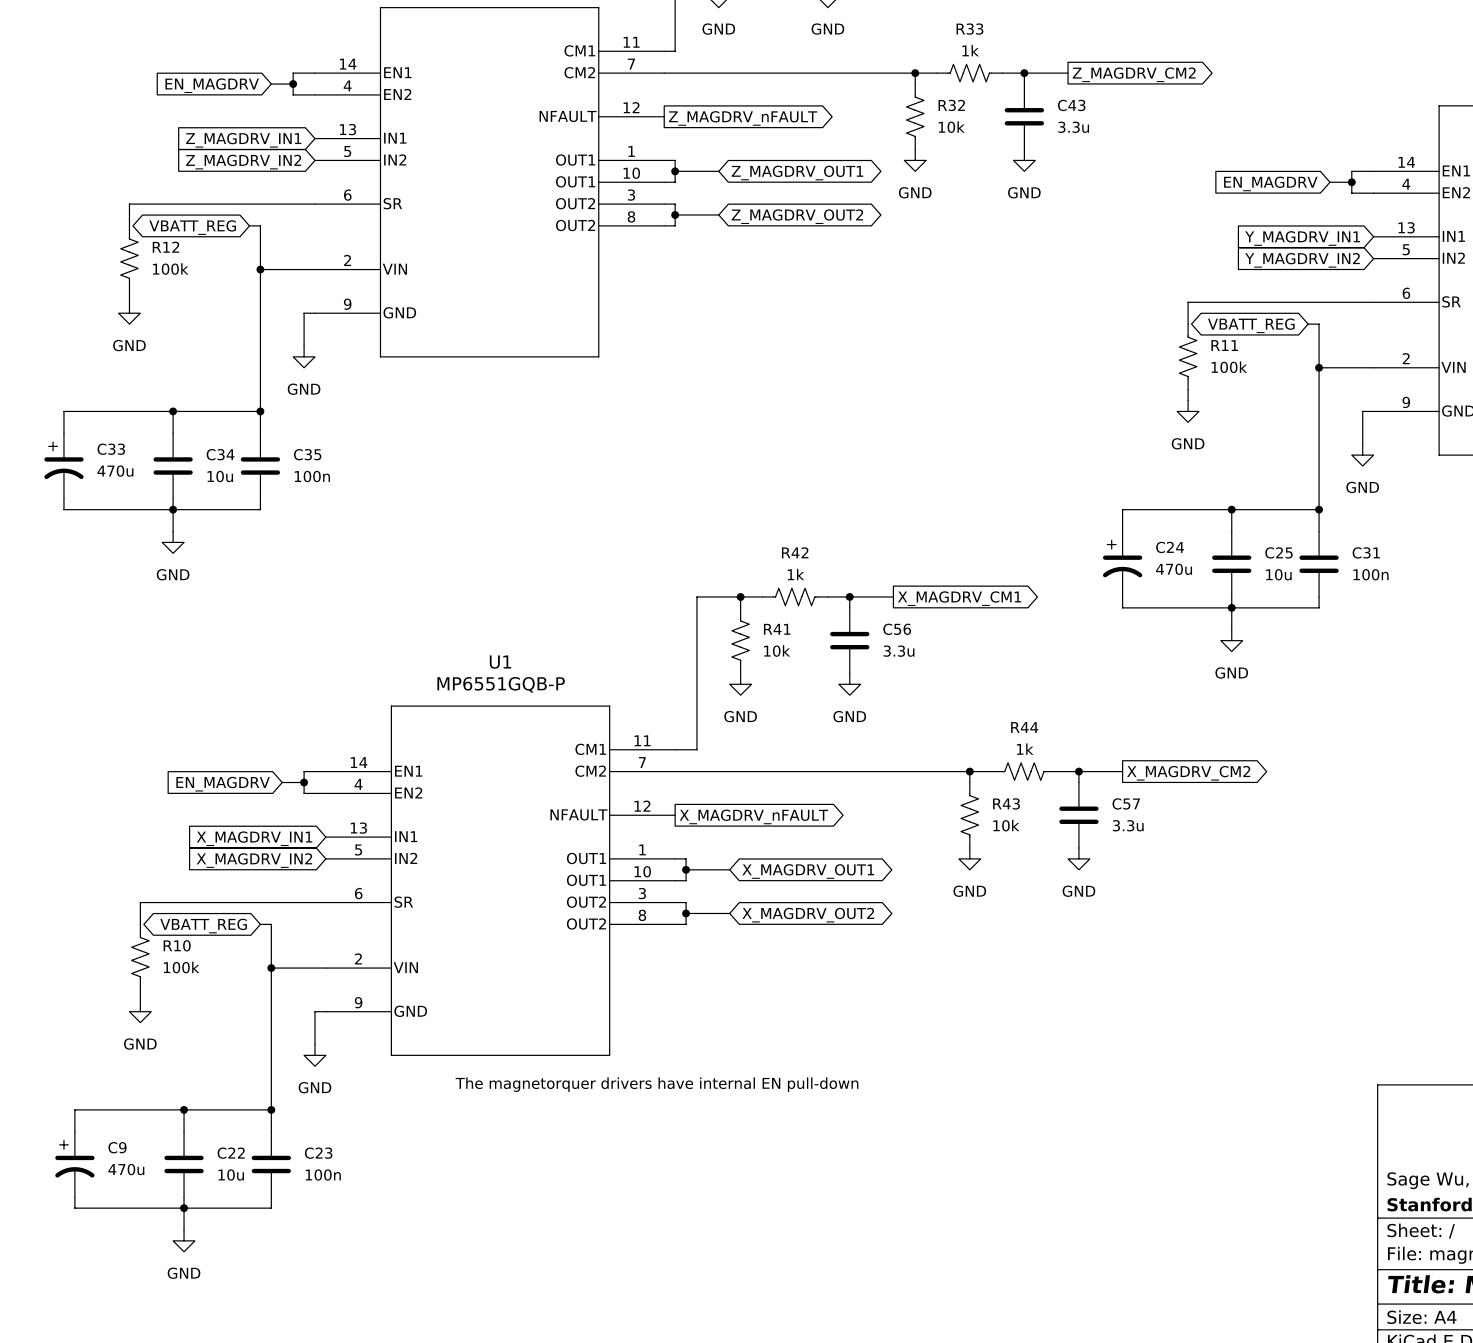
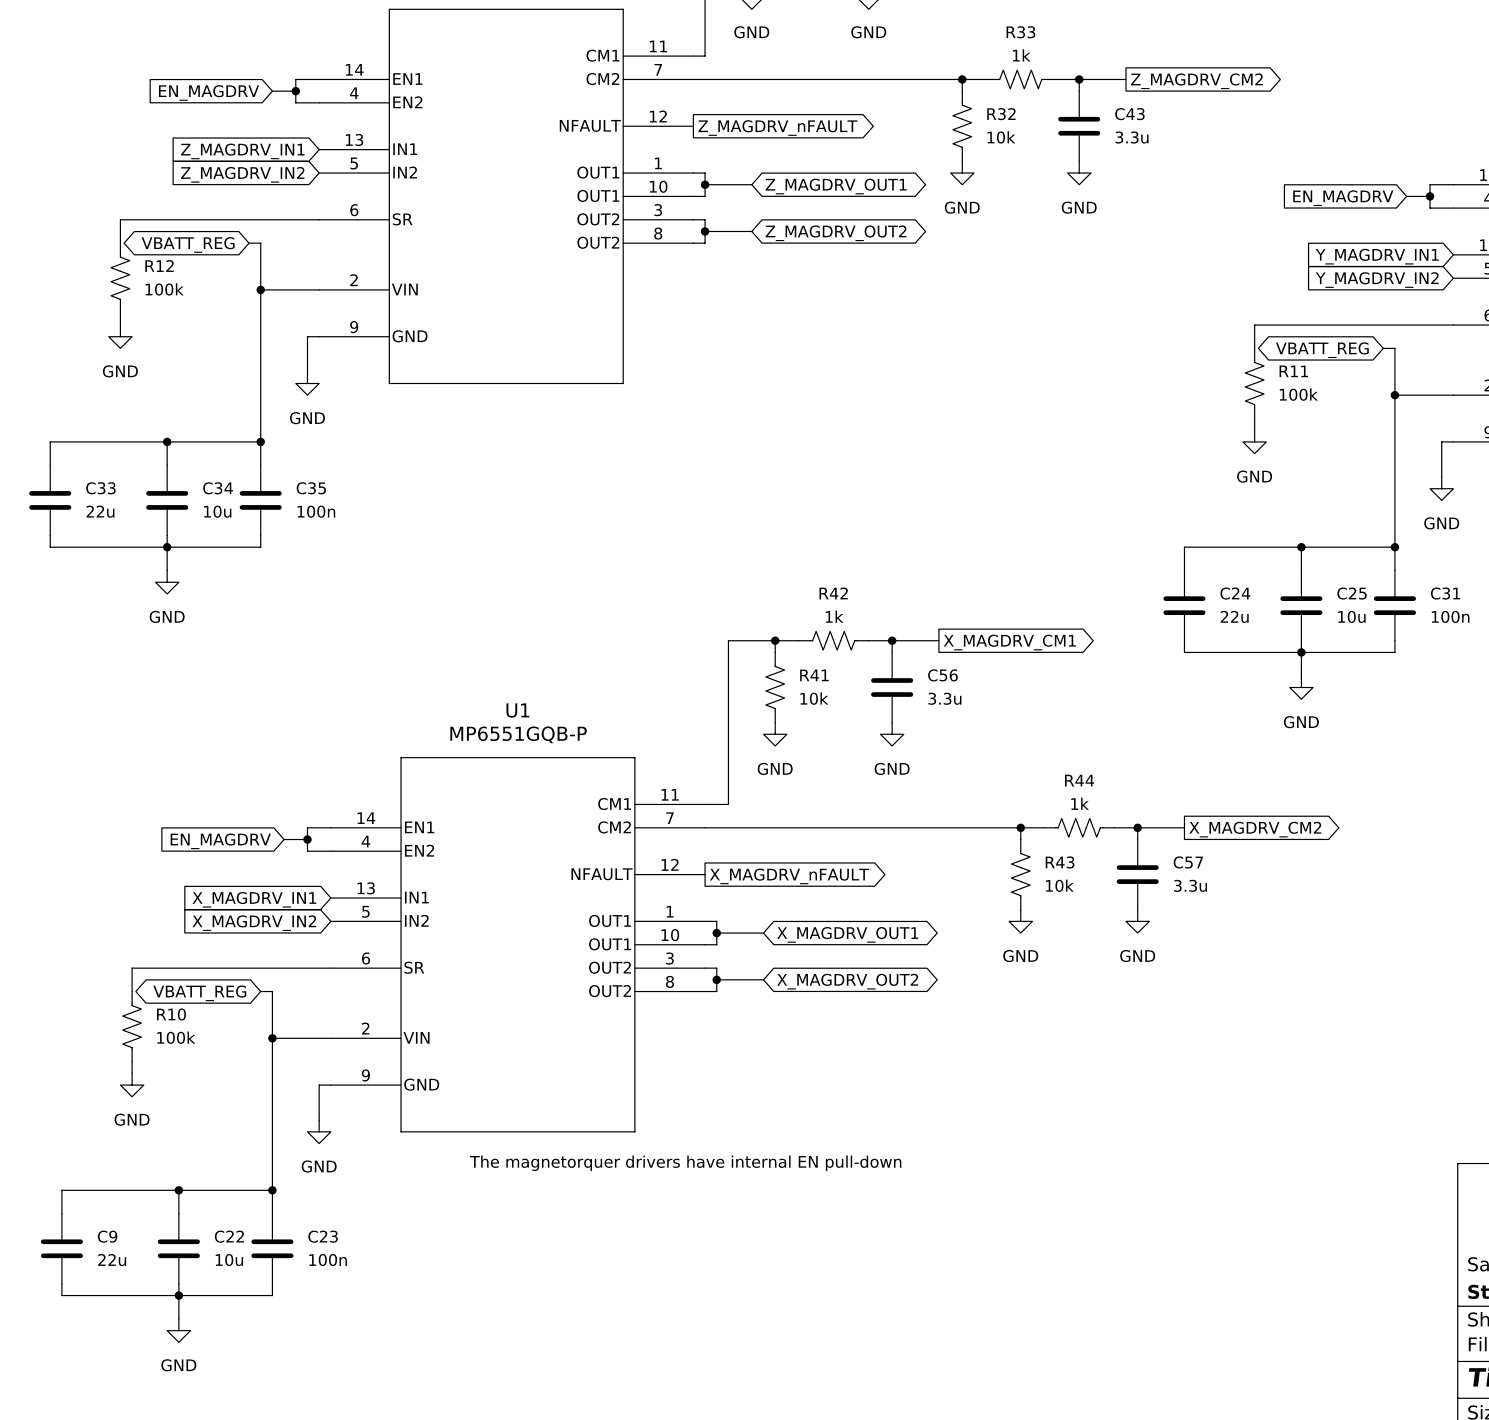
C33 symbol: [44, 433, 84, 499] -> [29, 465, 72, 536]
C33 value: 470u (115, 471) -> 22u (100, 511)
C24 symbol: [1102, 531, 1143, 597] -> [1163, 570, 1206, 641]
C24 value: 470u (1174, 569) -> 22u (1234, 616)
C9 symbol: [55, 1131, 95, 1198] -> [40, 1213, 83, 1284]
C9 value: 470u (126, 1169) -> 22u (112, 1260)

